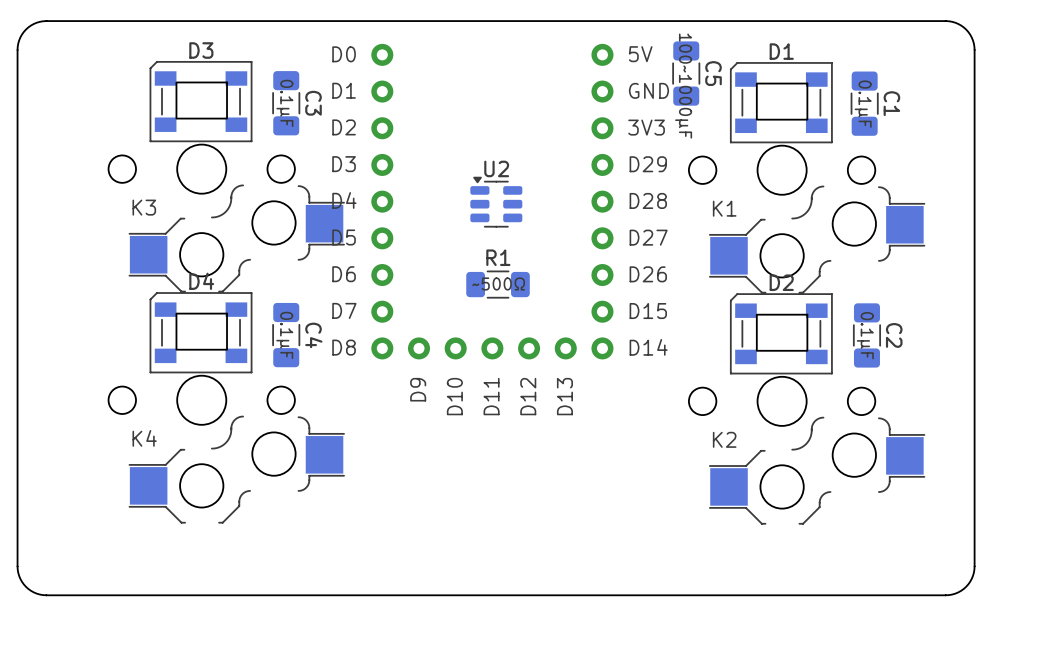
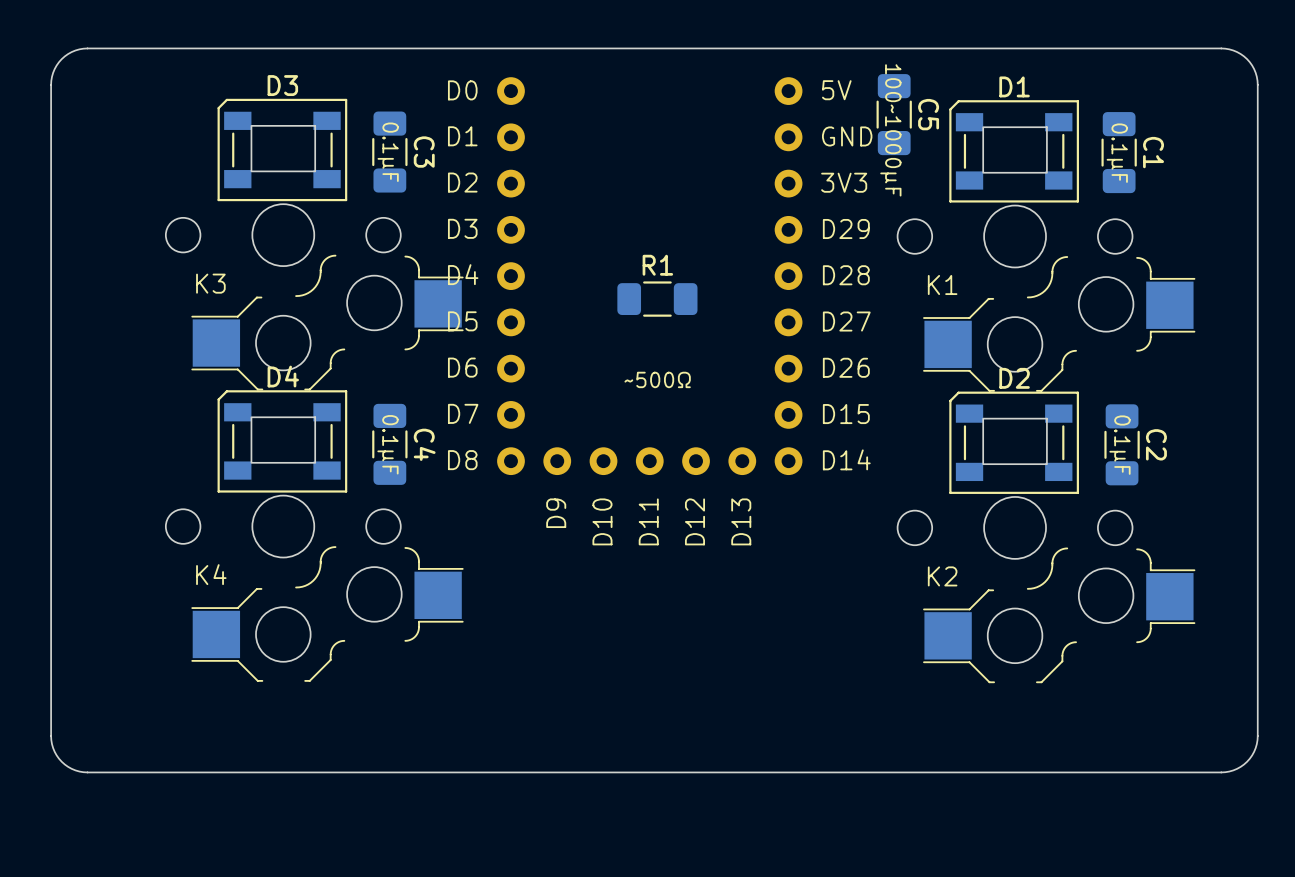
U2: (496, 202) -> none
R1 position: (498, 284) -> (657, 299)

